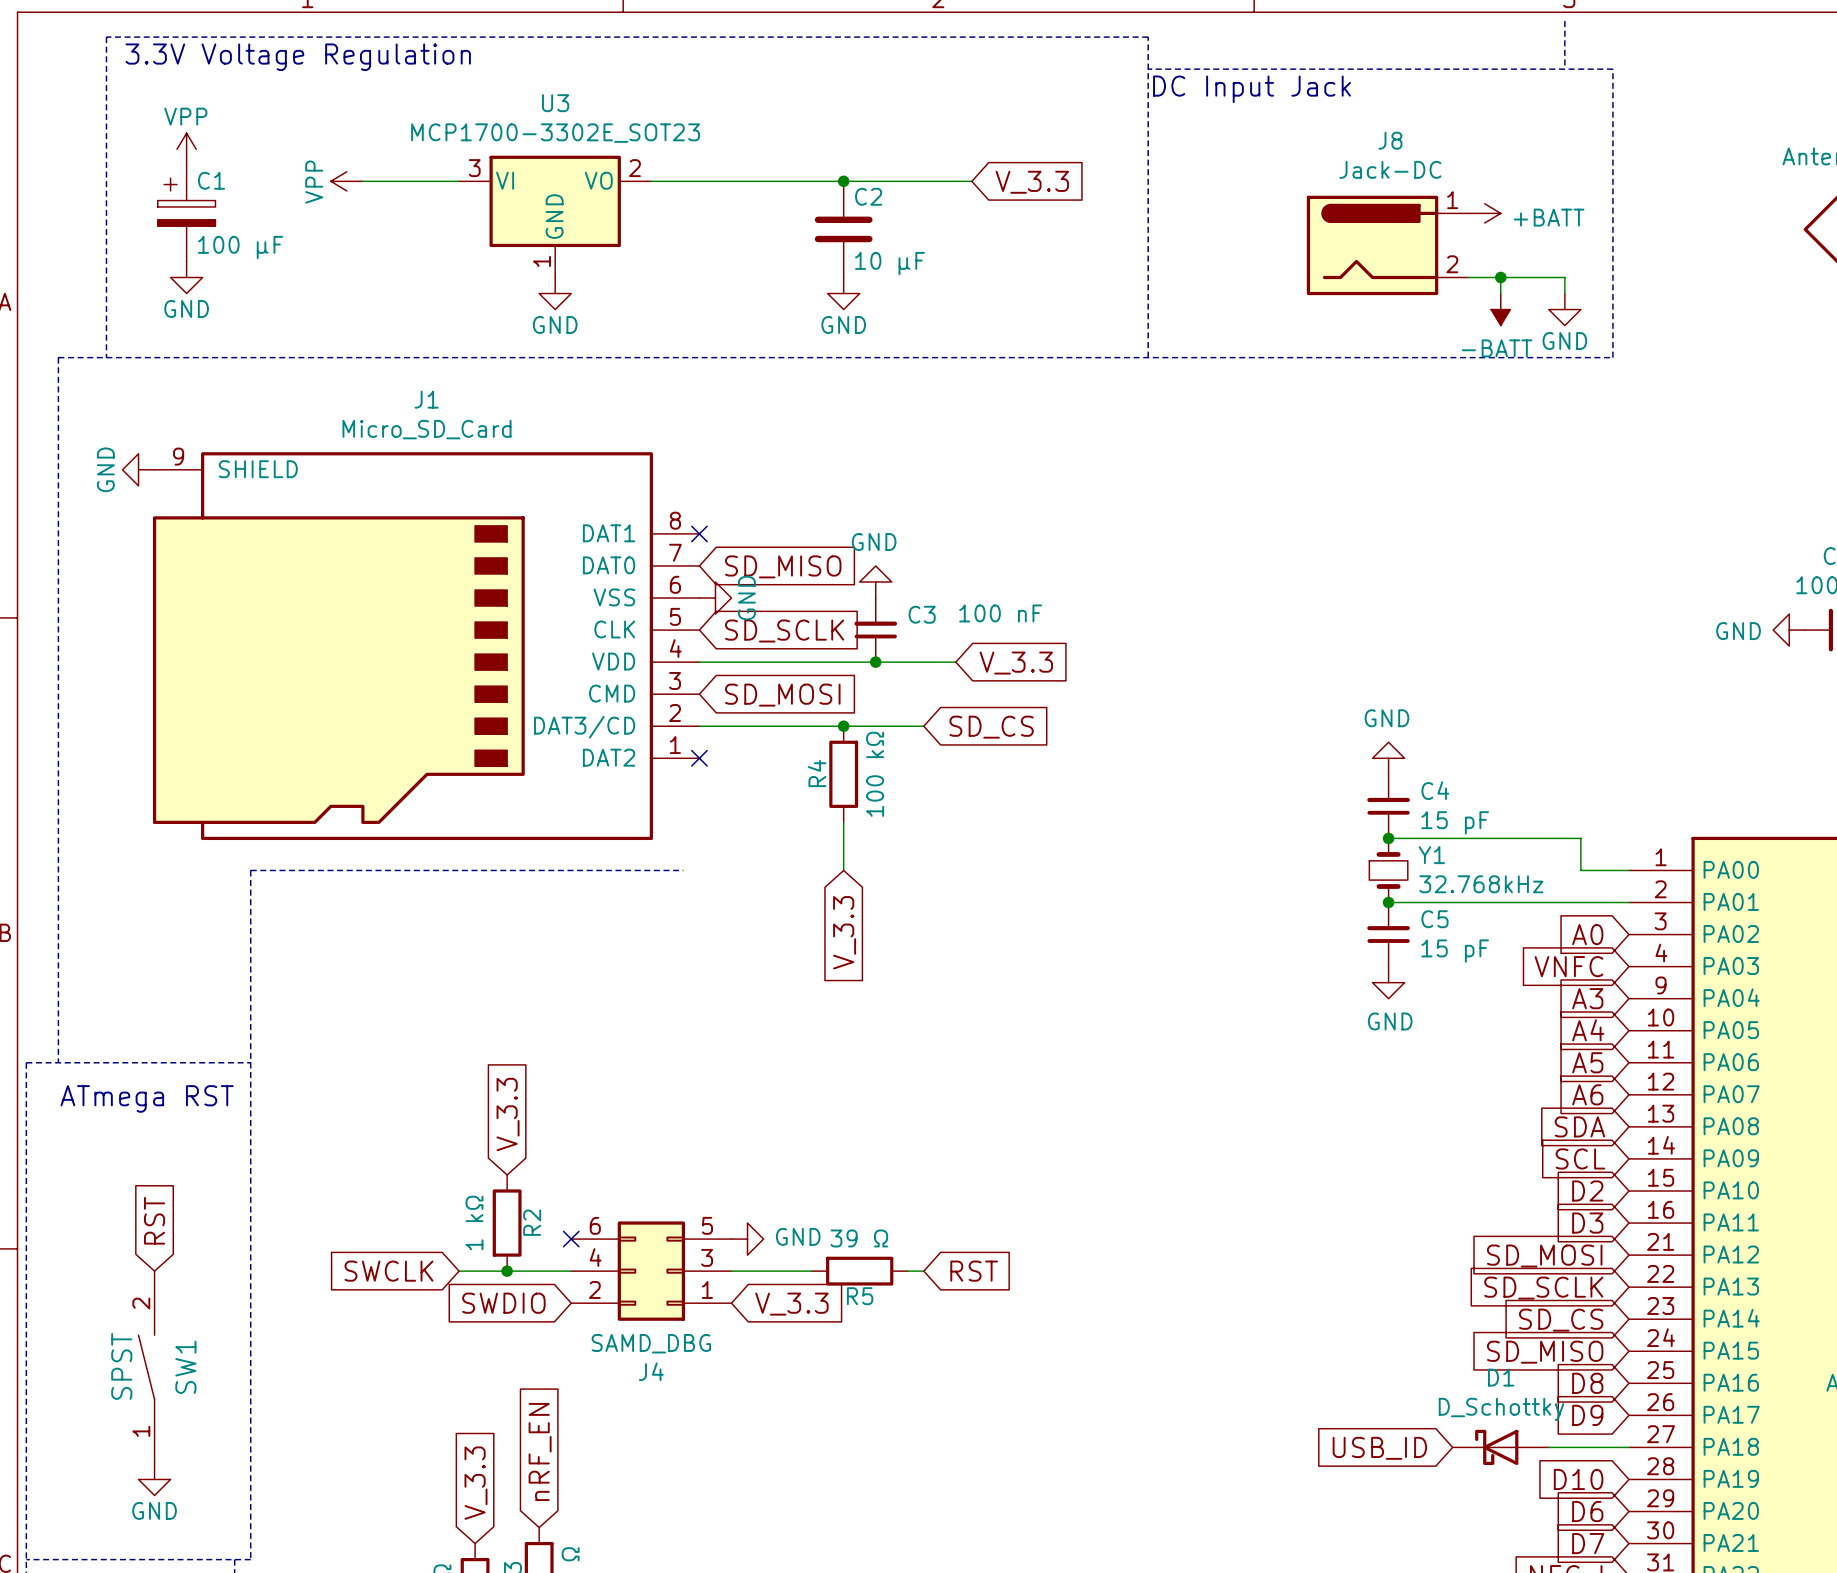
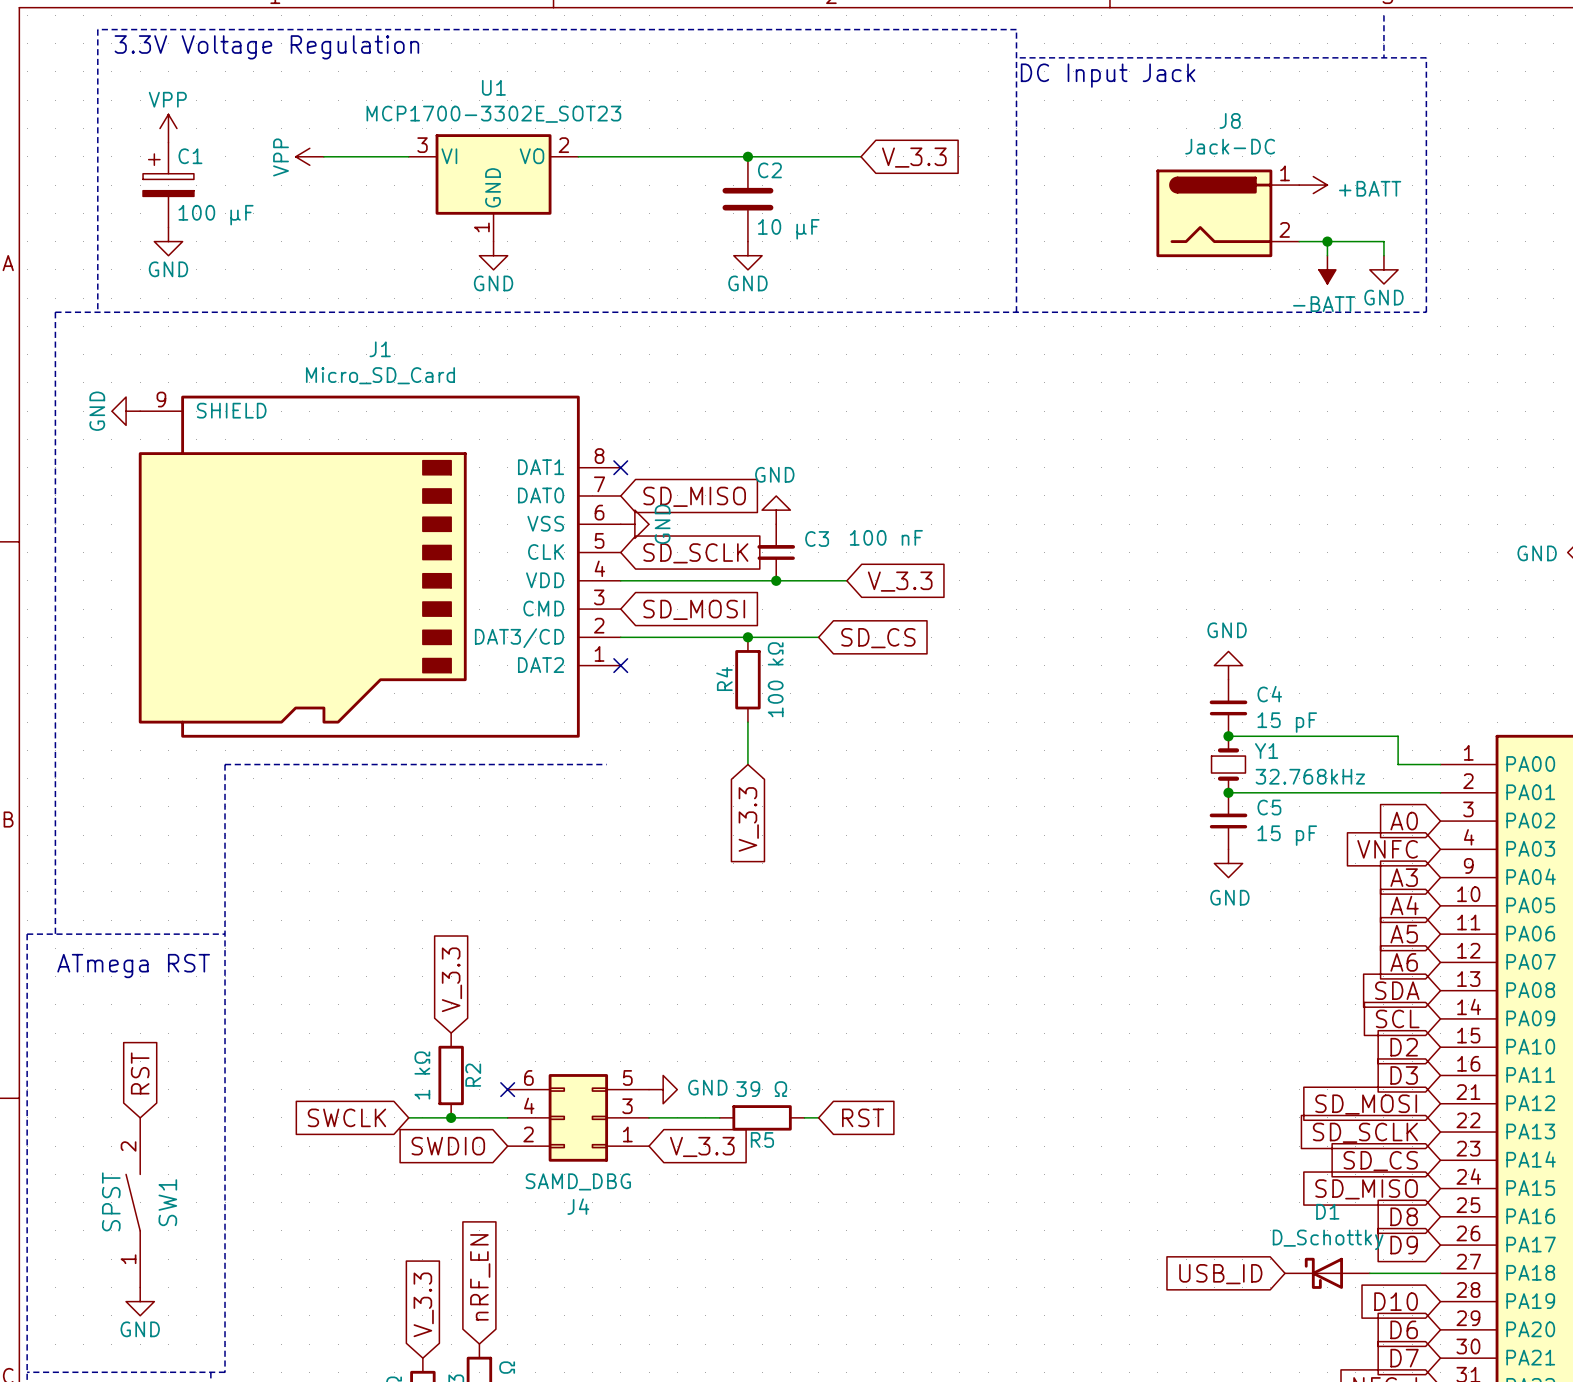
U3 name: U3 (555, 103) -> U1 (493, 87)

